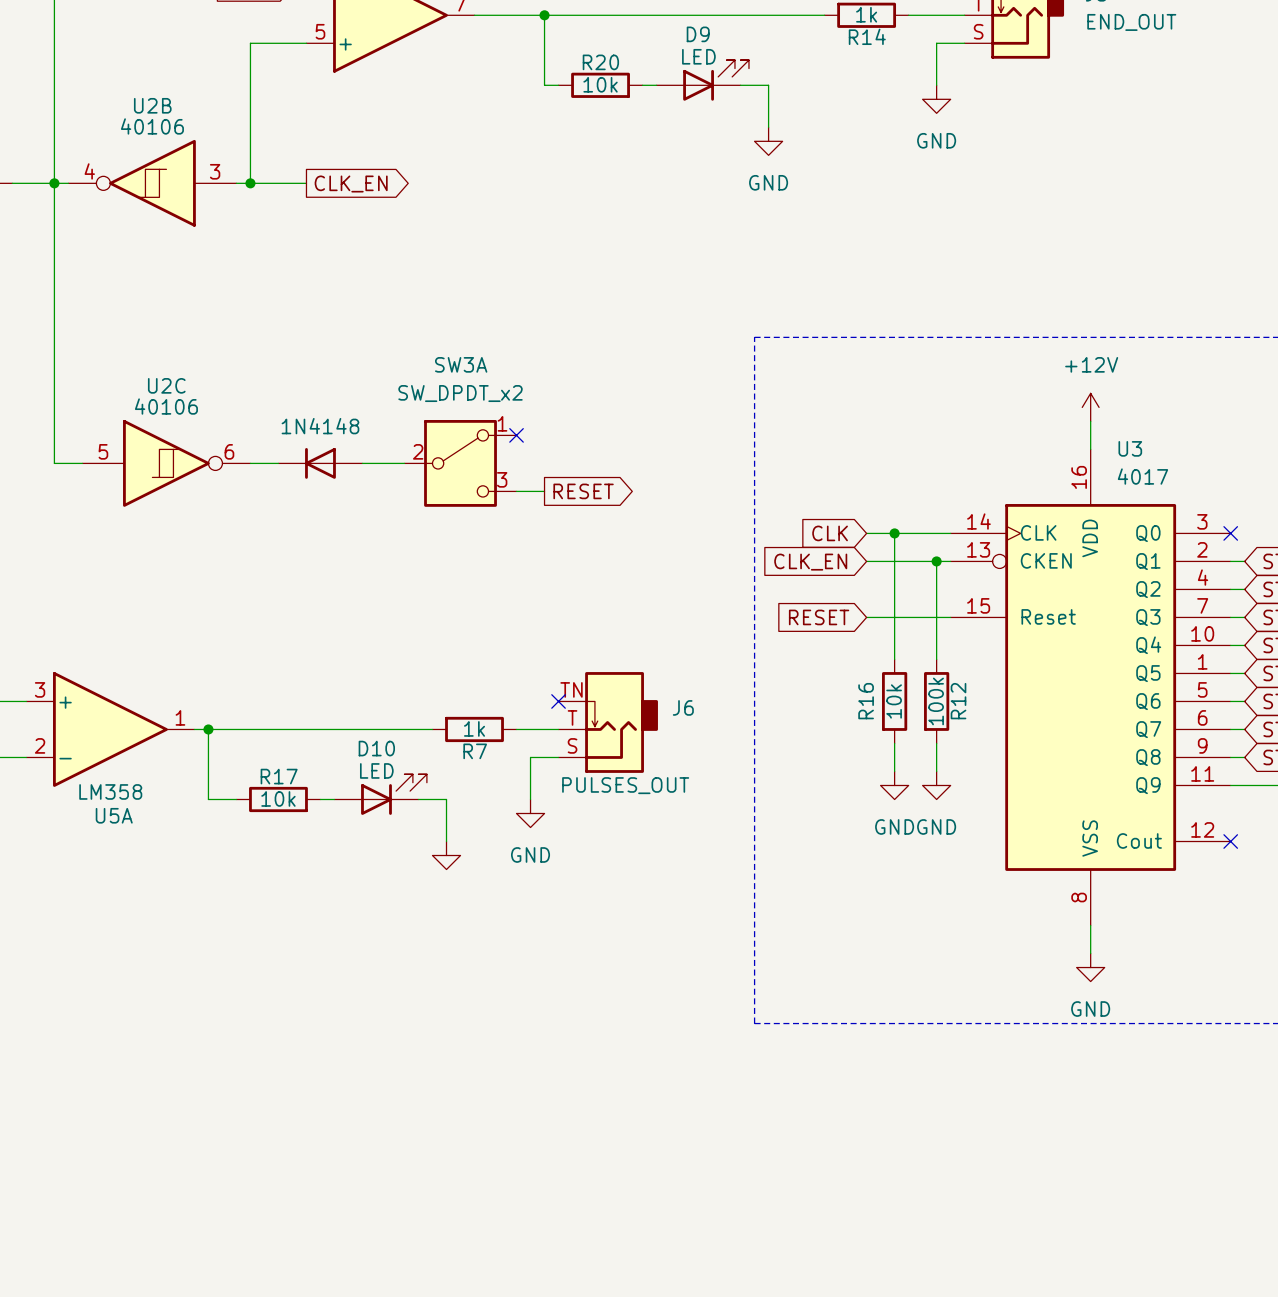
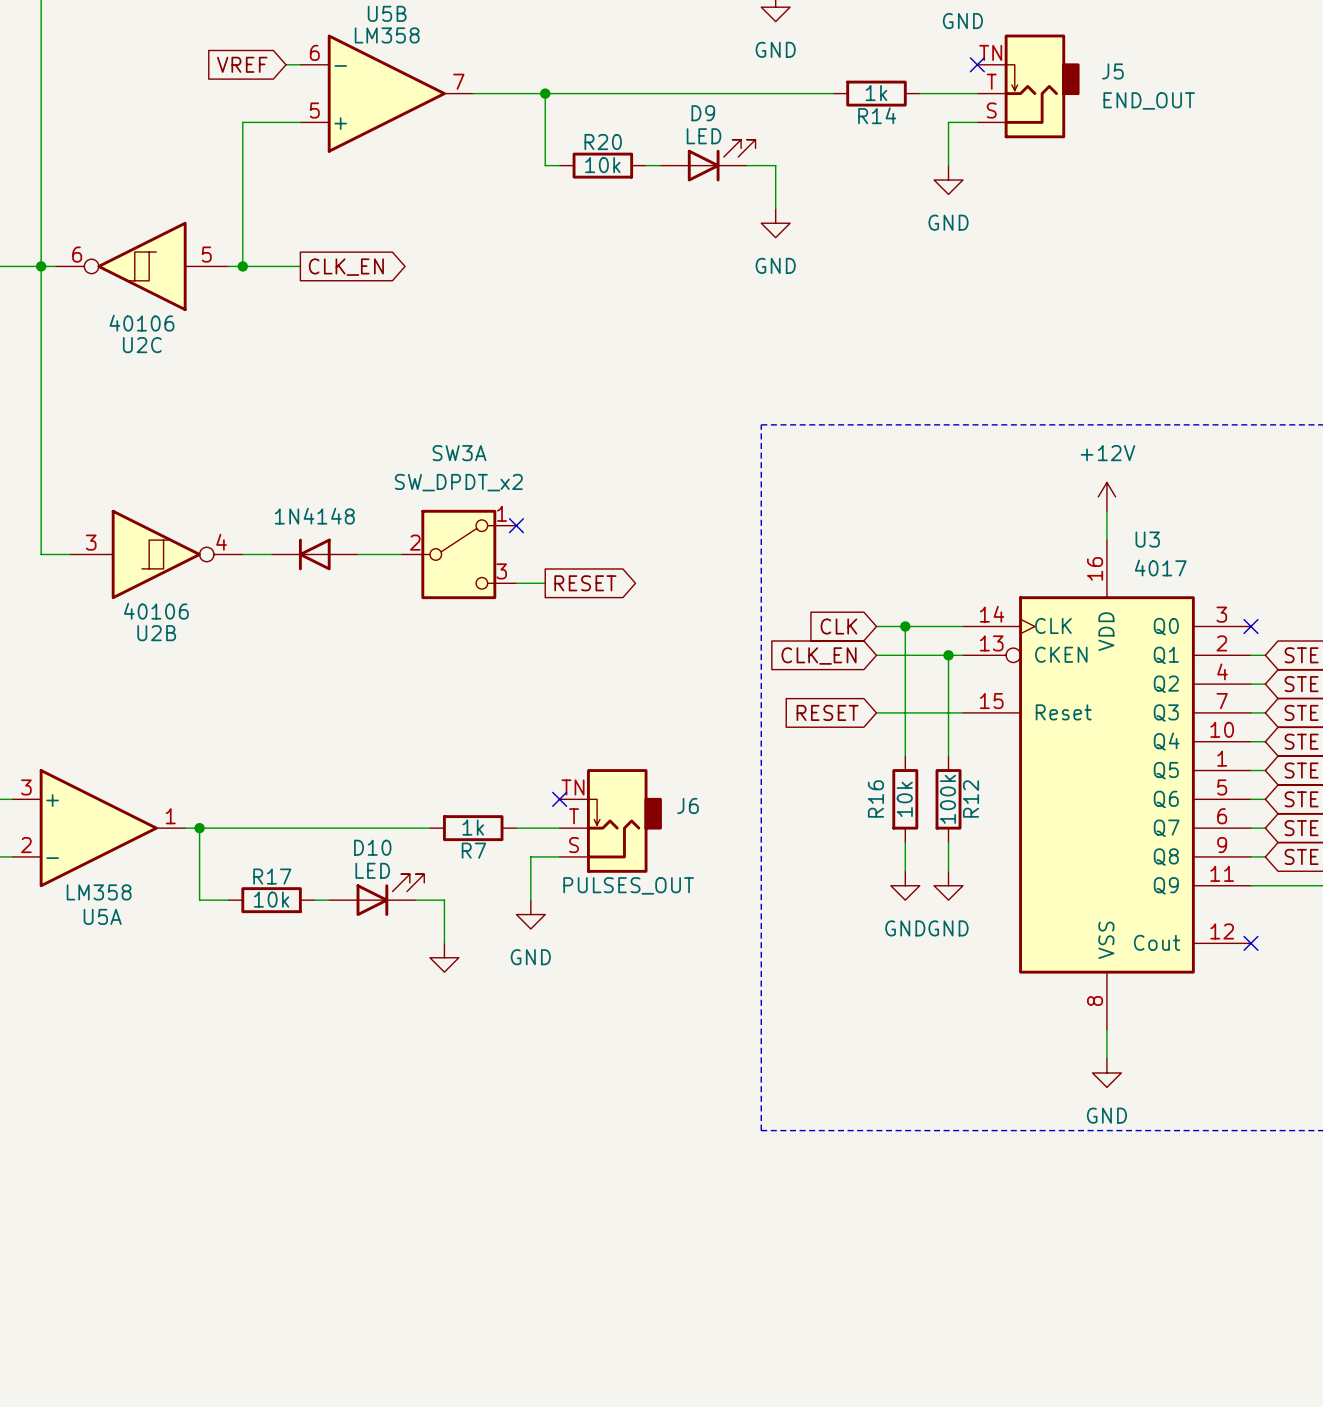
U2B rotation: 0° (152, 183) -> 180° (156, 554)
U2B position: (152, 183) -> (156, 554)
U2C rotation: 0° (166, 463) -> 180° (141, 266)
U2C position: (166, 463) -> (141, 266)

